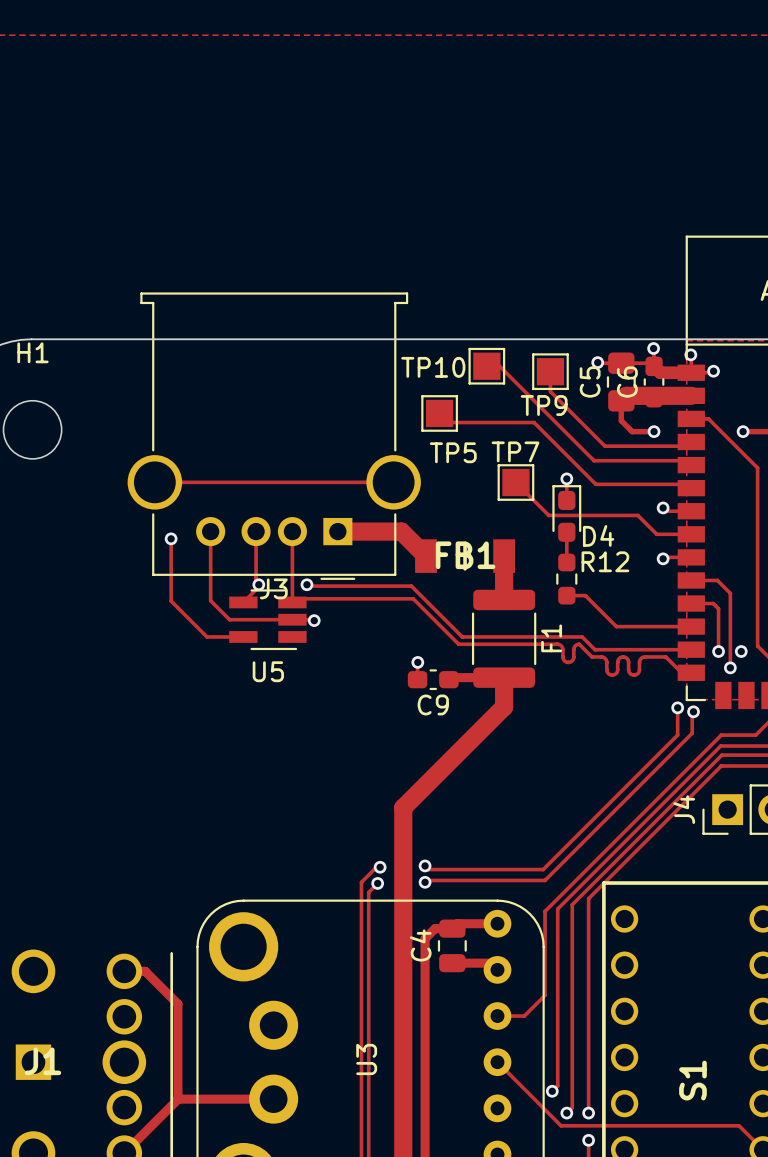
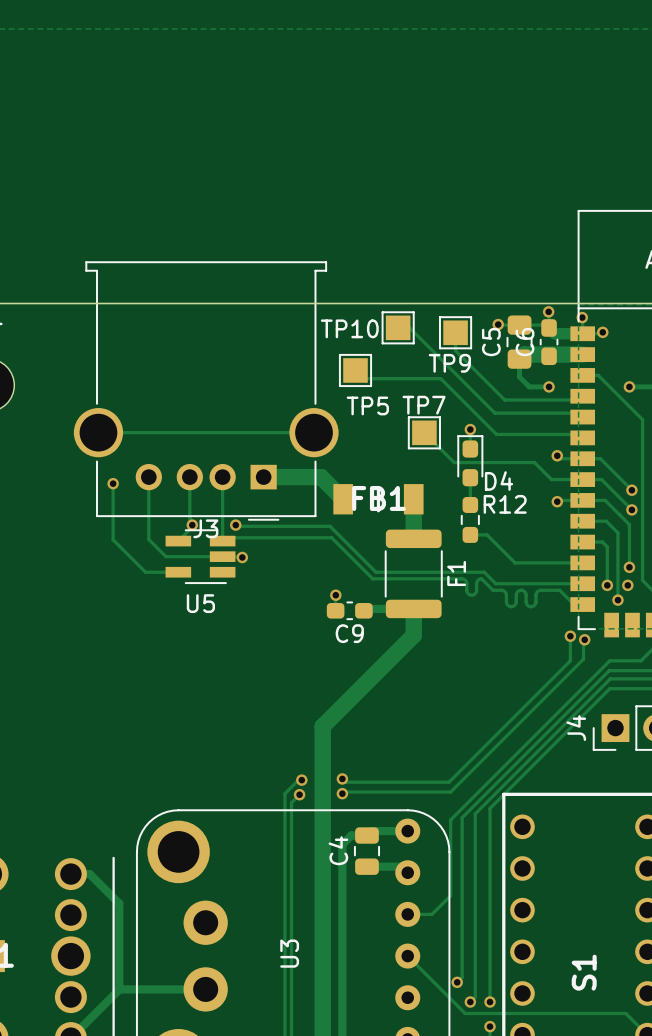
track: none -> (582, 458) (600, 458) (631, 490)
track: none -> (582, 479) (601, 479) (631, 509)
via: none -> (631, 490)
track: none -> (582, 500) (605, 500) (629, 524) (629, 567)
via: none -> (631, 509)
via: none -> (629, 567)

